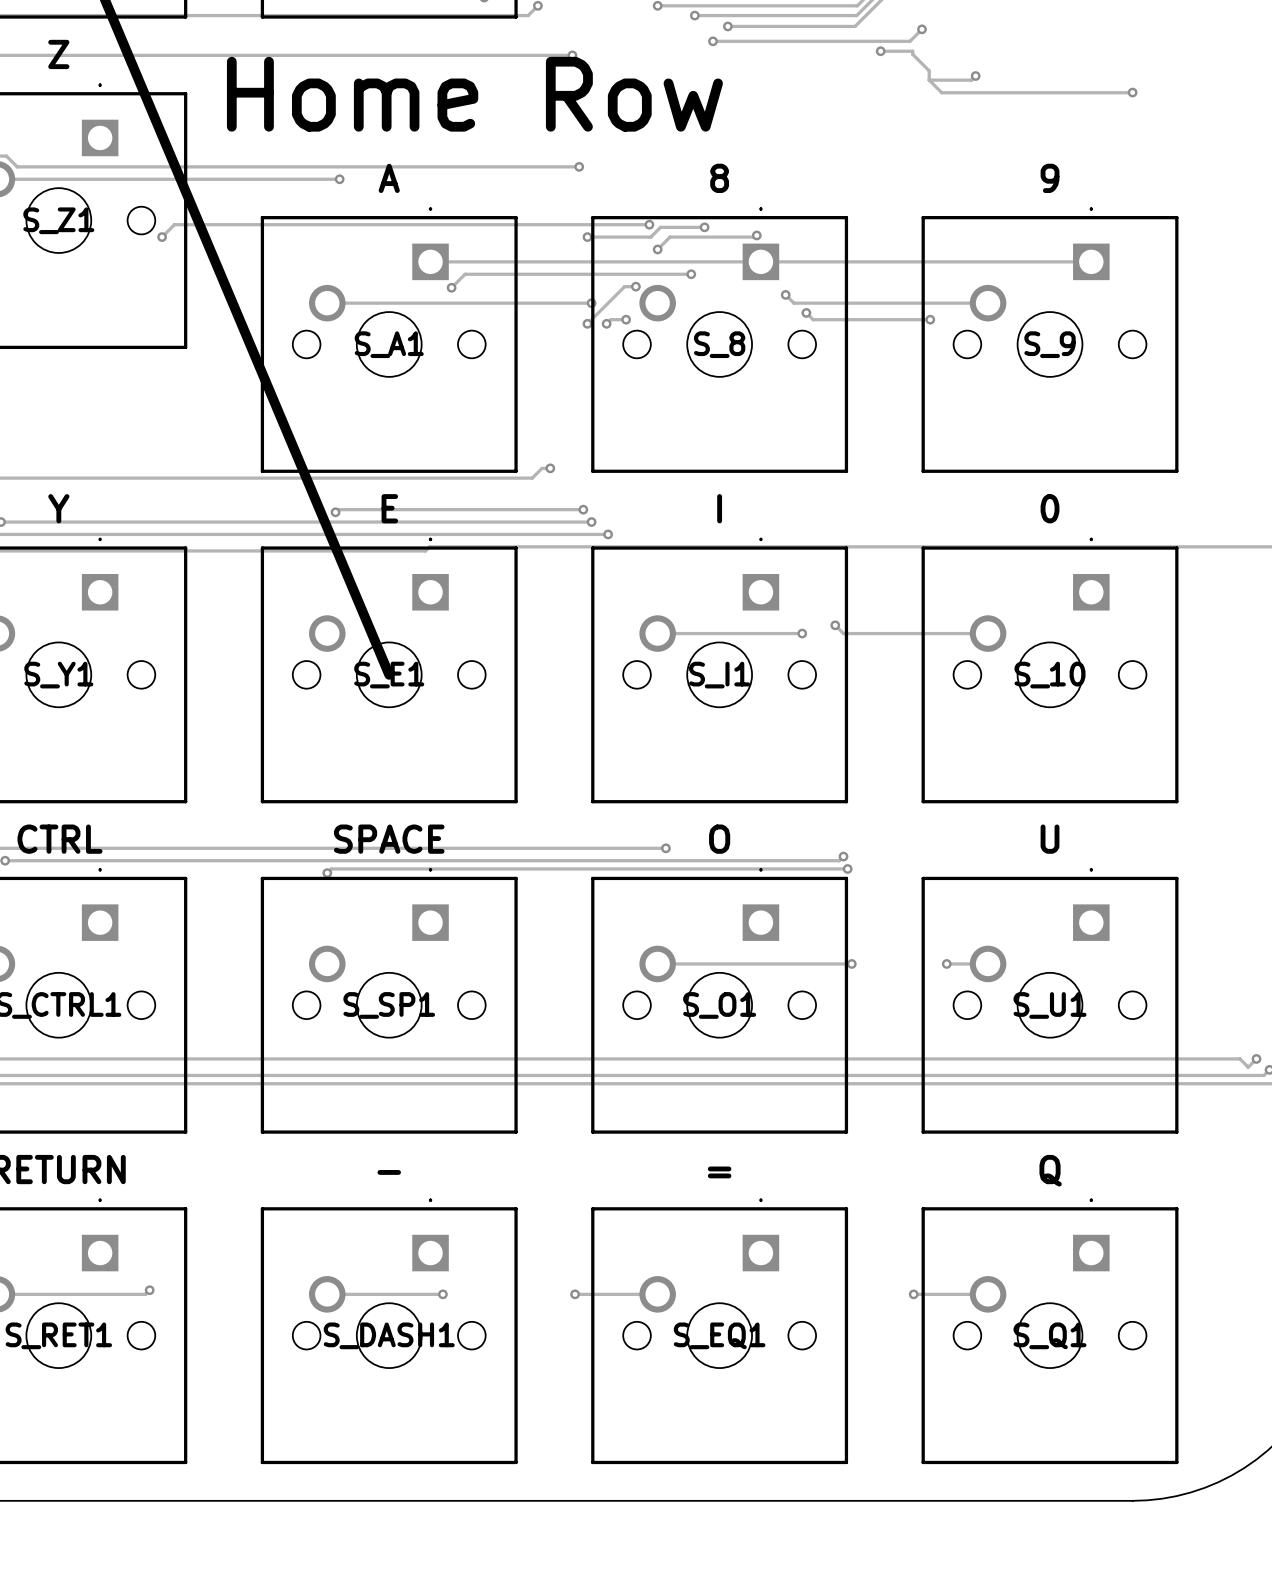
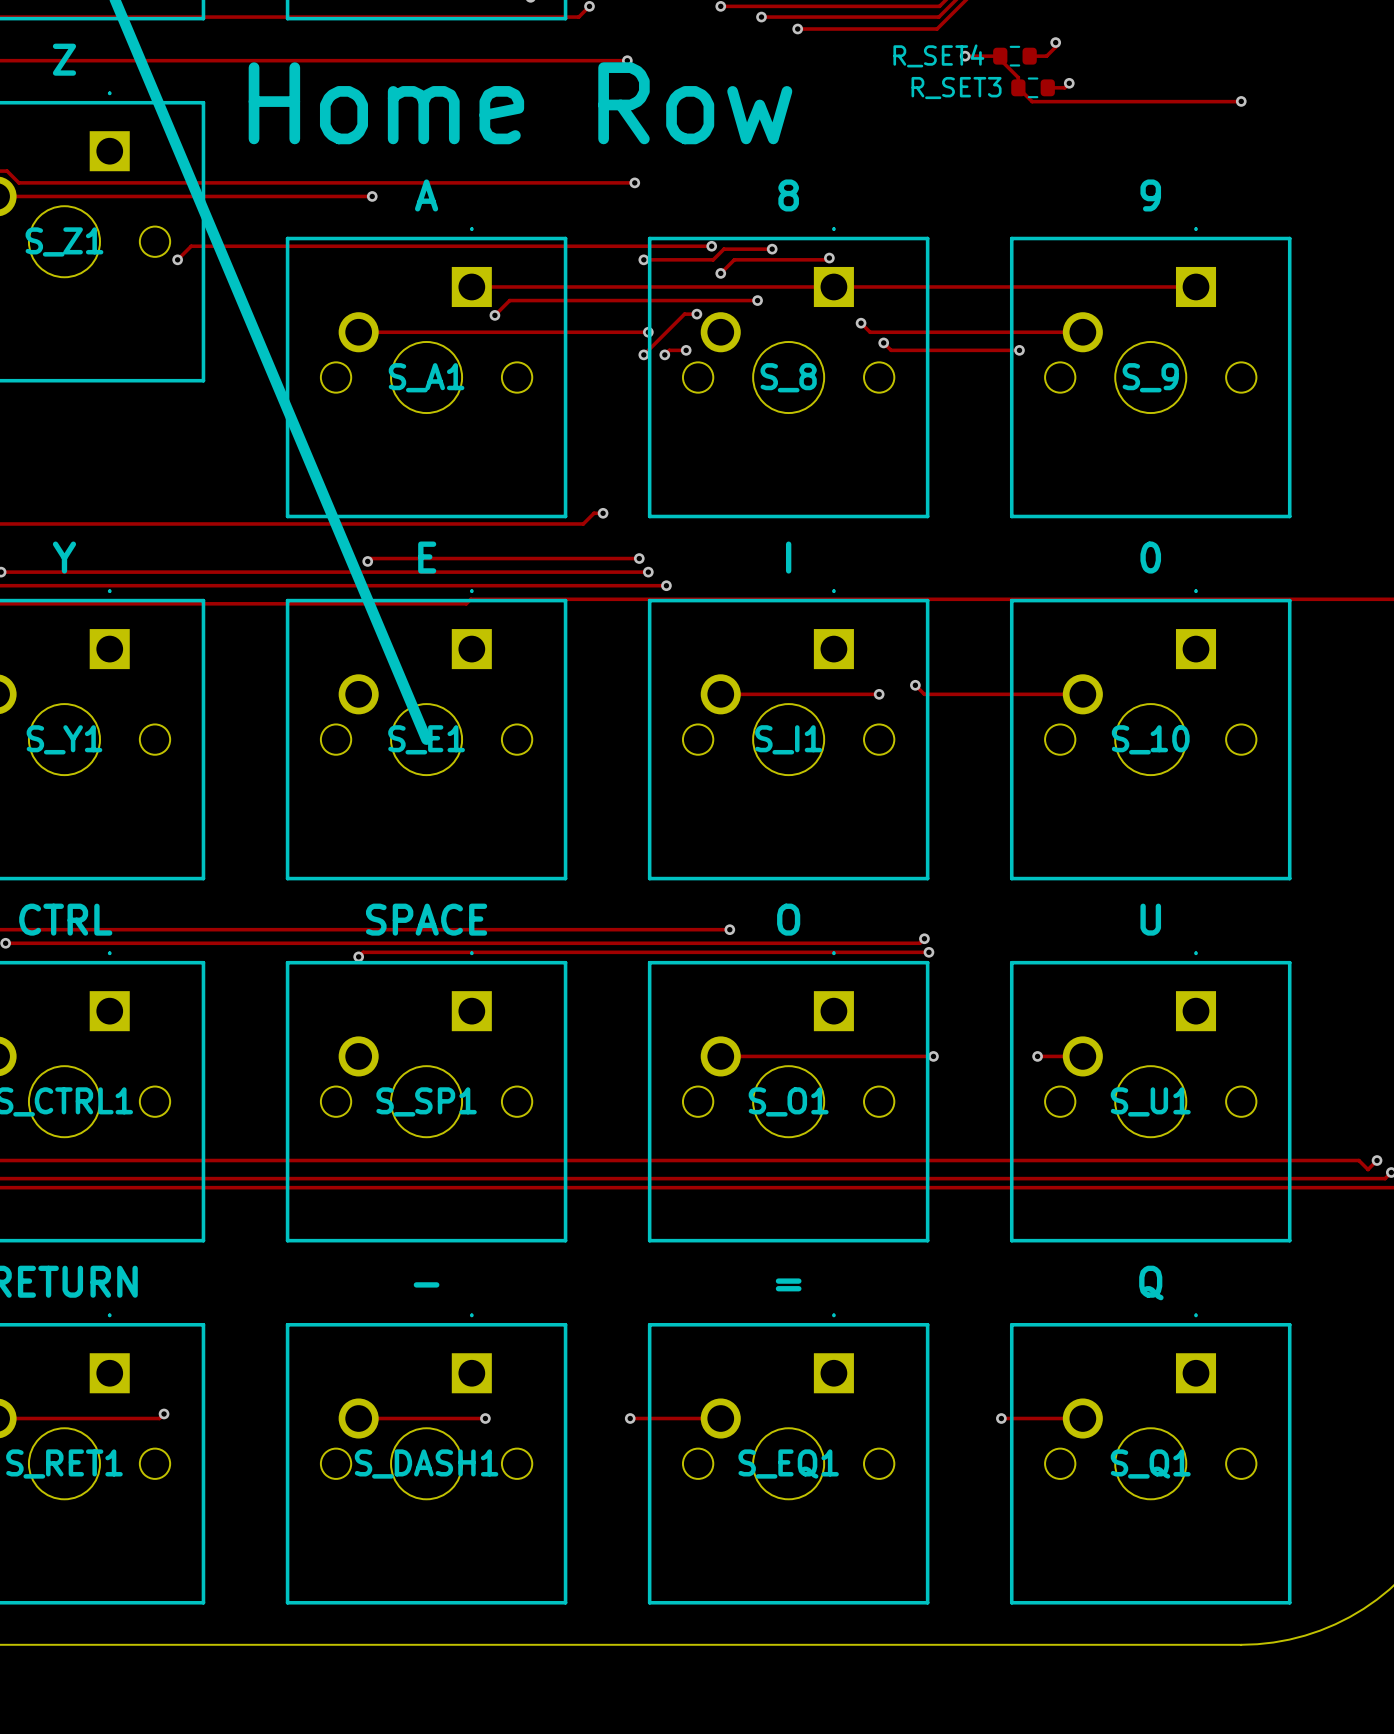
track: (921, 29) (910, 41) (713, 41) -> none
via position: (921, 29) -> (1055, 42)
track: none -> (1055, 42) (1055, 47) (1046, 56) (1029, 56)
via: (713, 41) -> none
R_SET4: none -> (1014, 56)
track: (929, 80) (956, 80) -> none
R_SET3: none -> (1033, 87)

